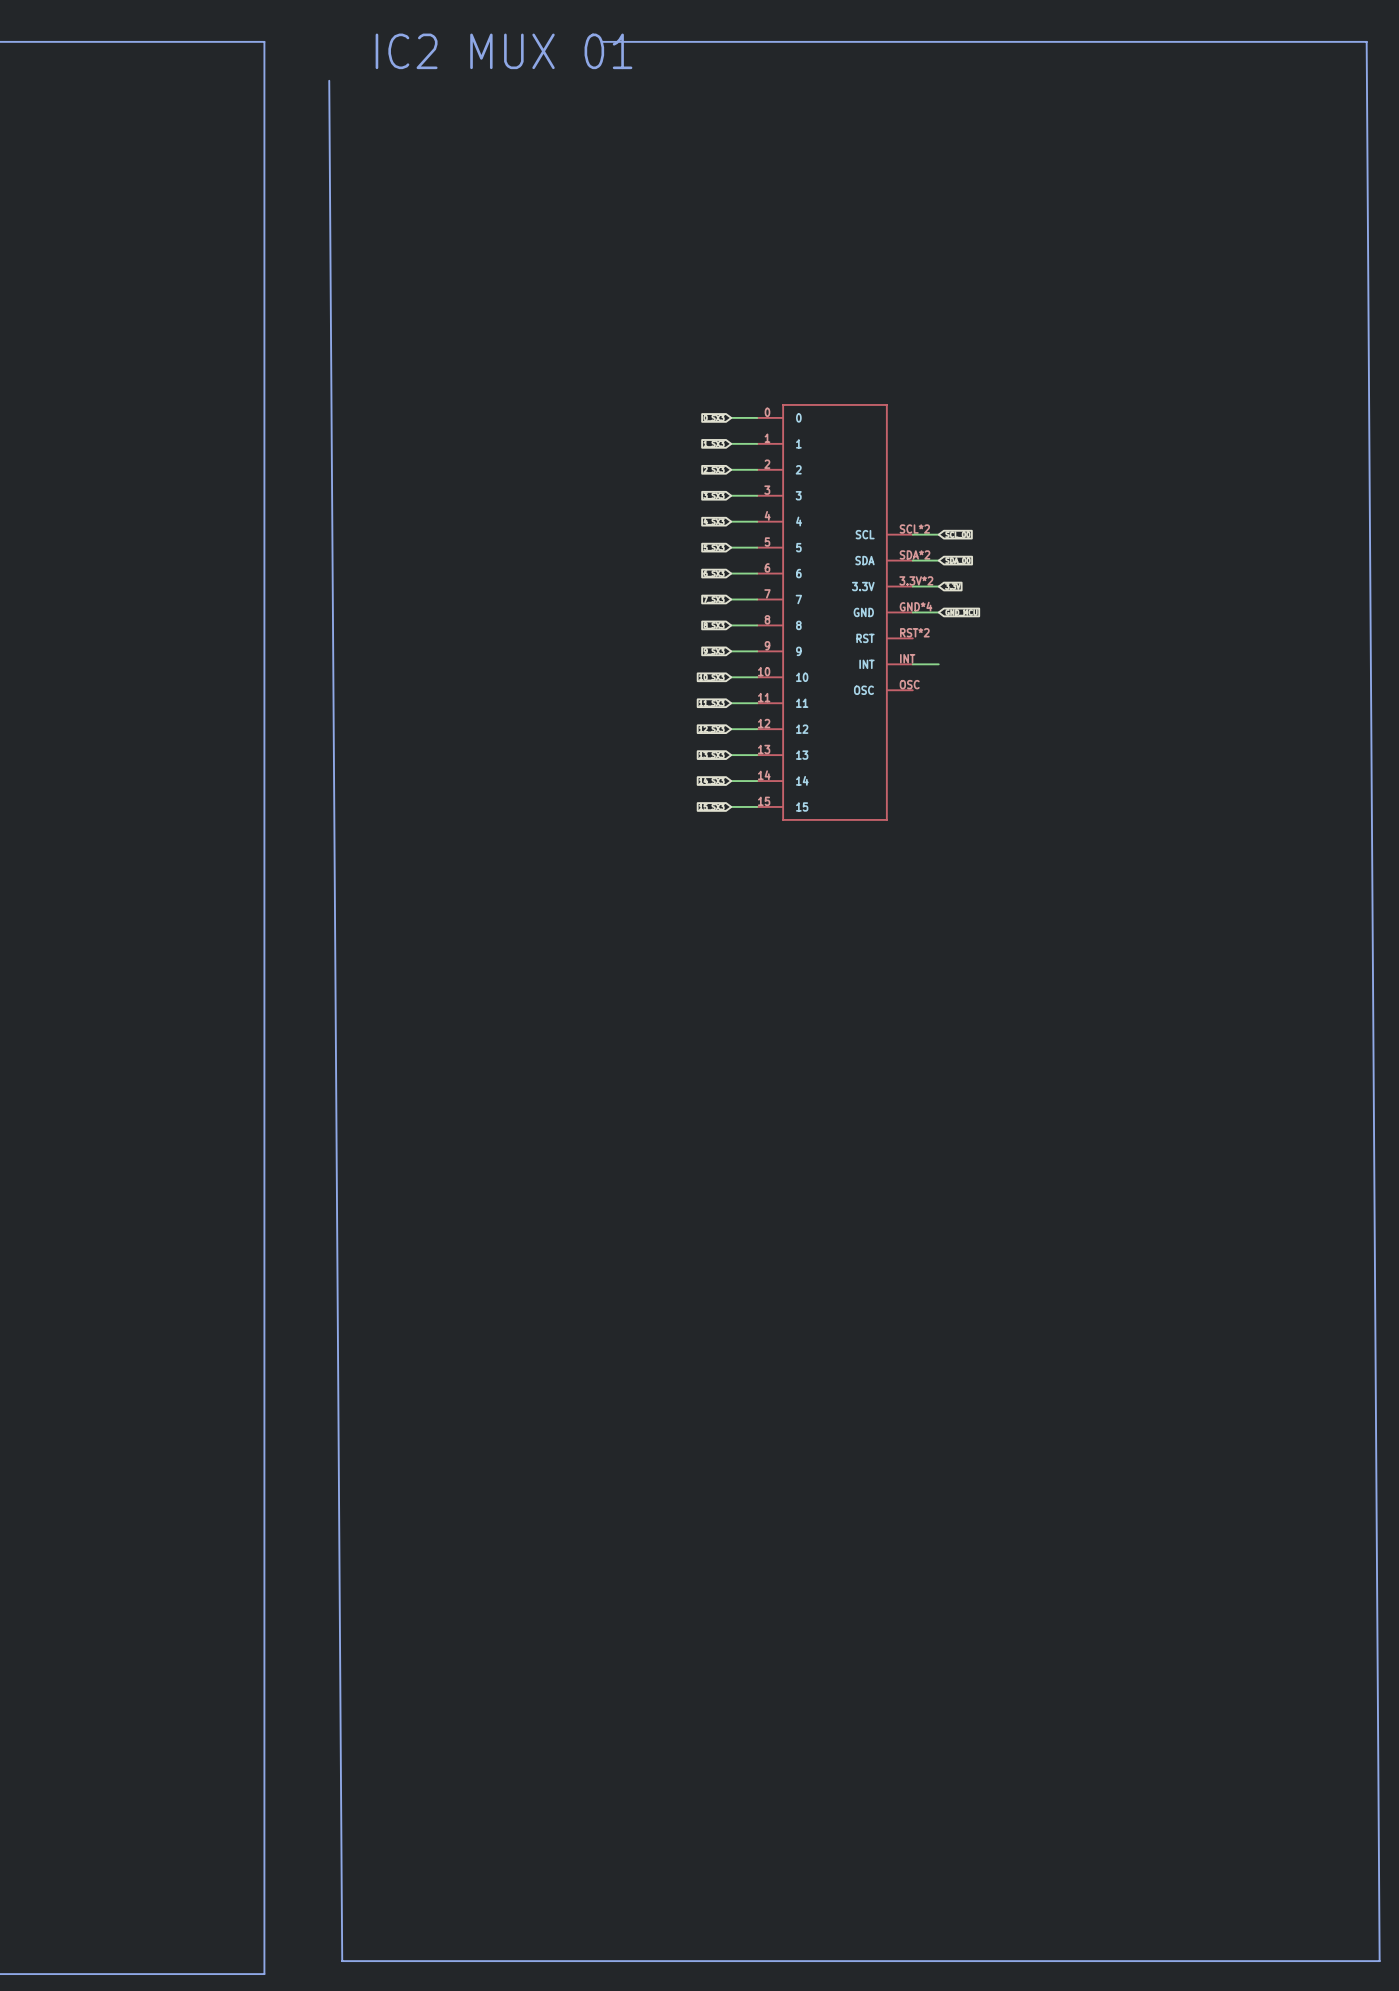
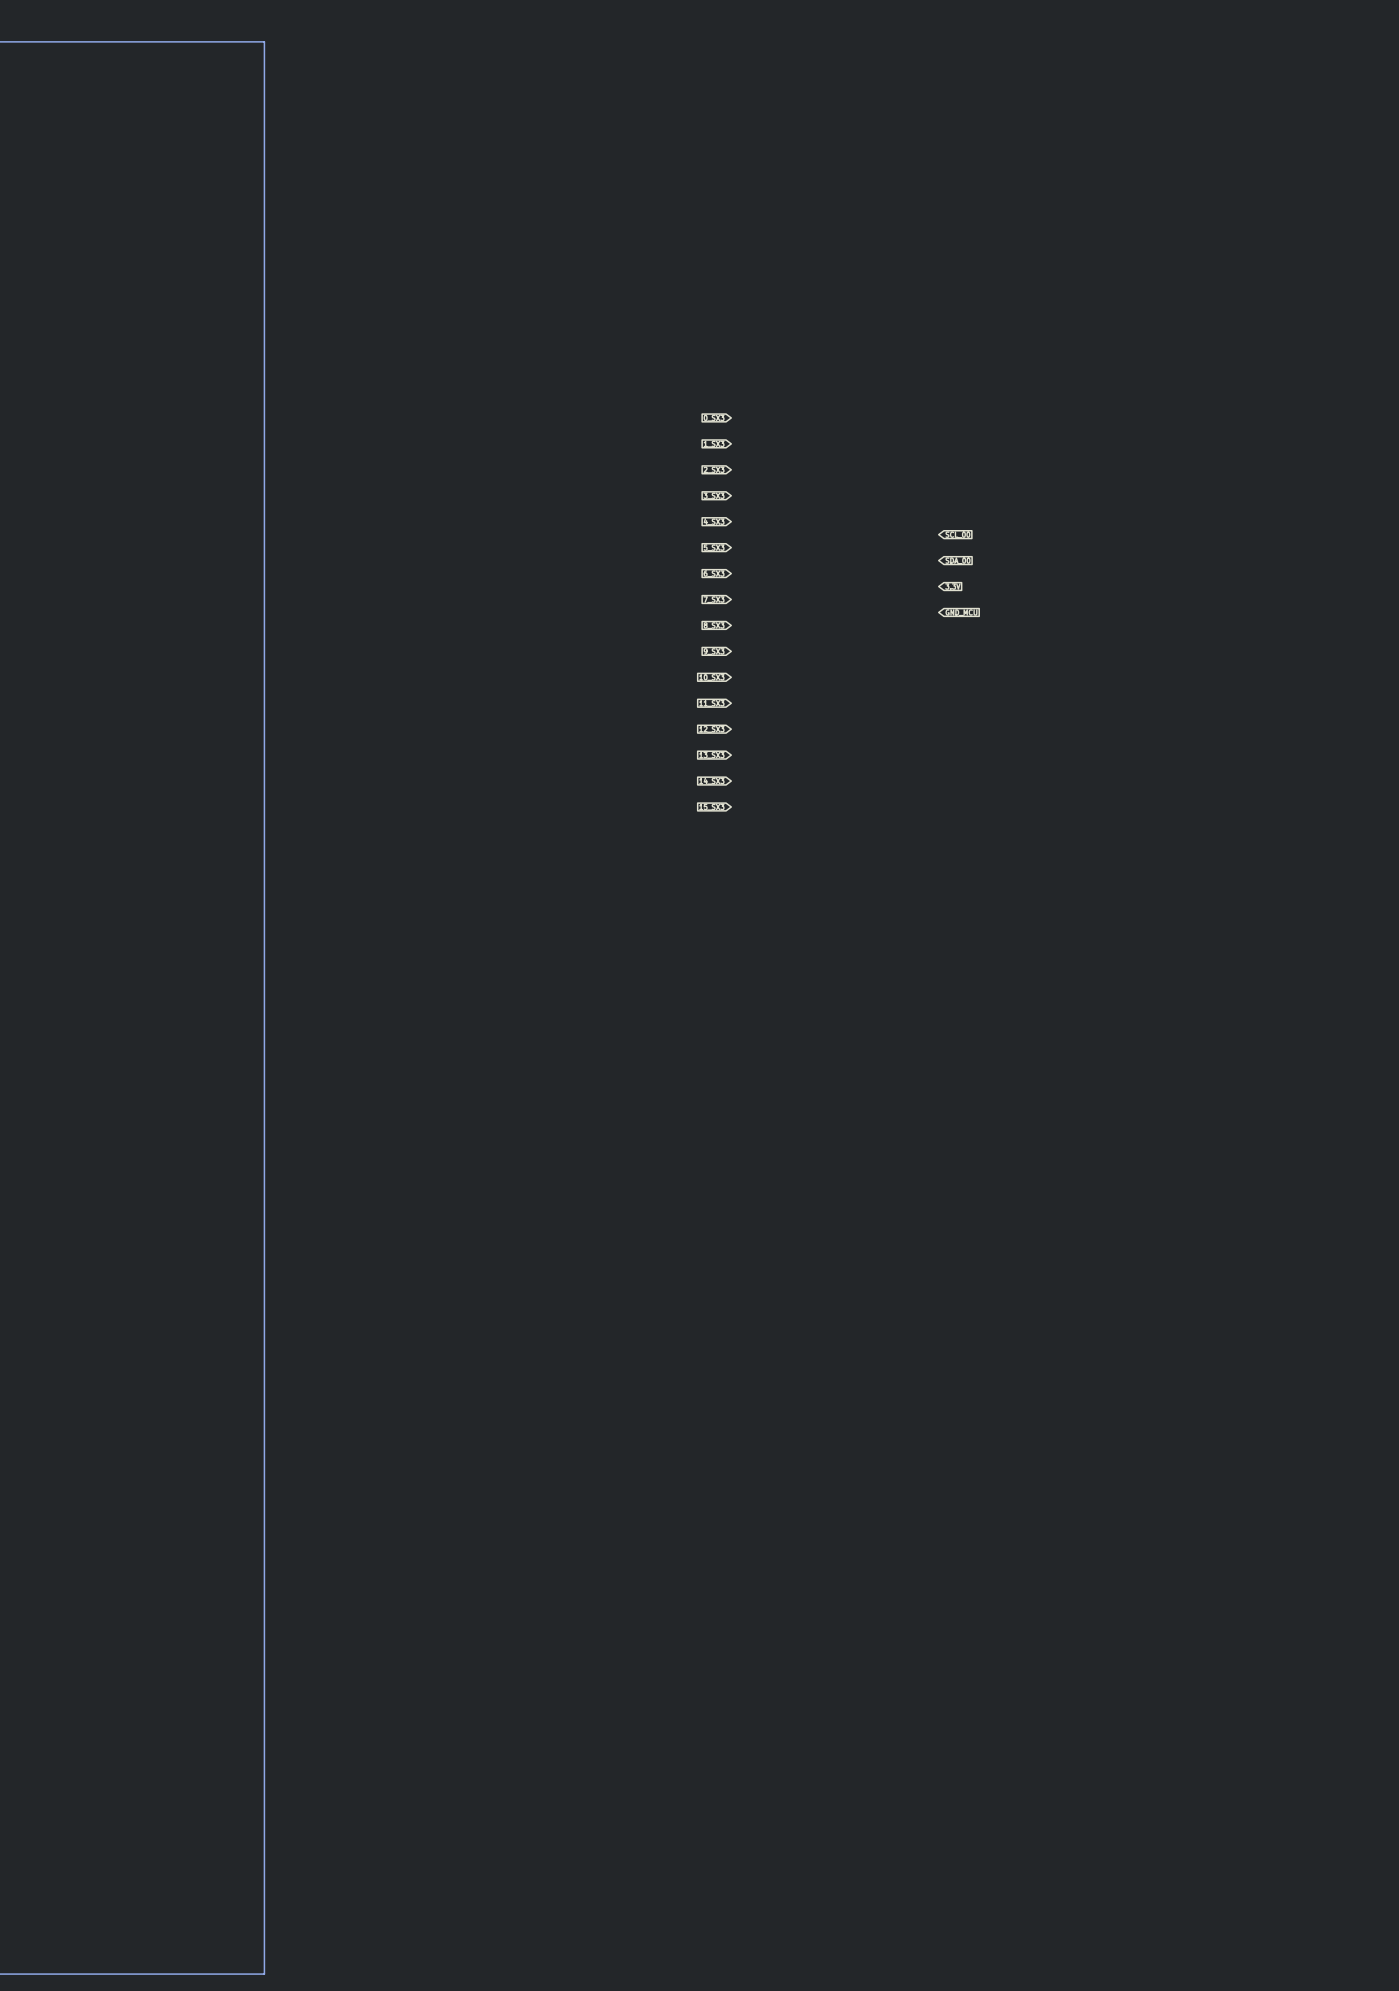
line: (601, 41) (1366, 41) (1379, 1961) (342, 1961) (329, 80) -> none
text: IC2 MUX 01 (503, 51) -> none
wire: (731, 417) (757, 417) -> none
wire: (731, 443) (757, 443) -> none
wire: (731, 469) (757, 469) -> none
wire: (731, 495) (757, 495) -> none
wire: (731, 521) (757, 521) -> none
wire: (912, 534) (938, 534) -> none
wire: (731, 547) (757, 547) -> none
wire: (912, 560) (938, 560) -> none
wire: (731, 573) (757, 573) -> none
wire: (912, 586) (938, 586) -> none
wire: (731, 599) (757, 599) -> none
part: (834, 612) -> none
wire: (912, 612) (938, 612) -> none
wire: (731, 625) (757, 625) -> none
wire: (731, 651) (757, 651) -> none
wire: (912, 664) (938, 664) -> none
wire: (731, 677) (757, 677) -> none
wire: (731, 703) (757, 703) -> none
wire: (731, 729) (757, 729) -> none
wire: (731, 755) (757, 755) -> none
wire: (731, 781) (757, 781) -> none
wire: (731, 806) (757, 806) -> none

